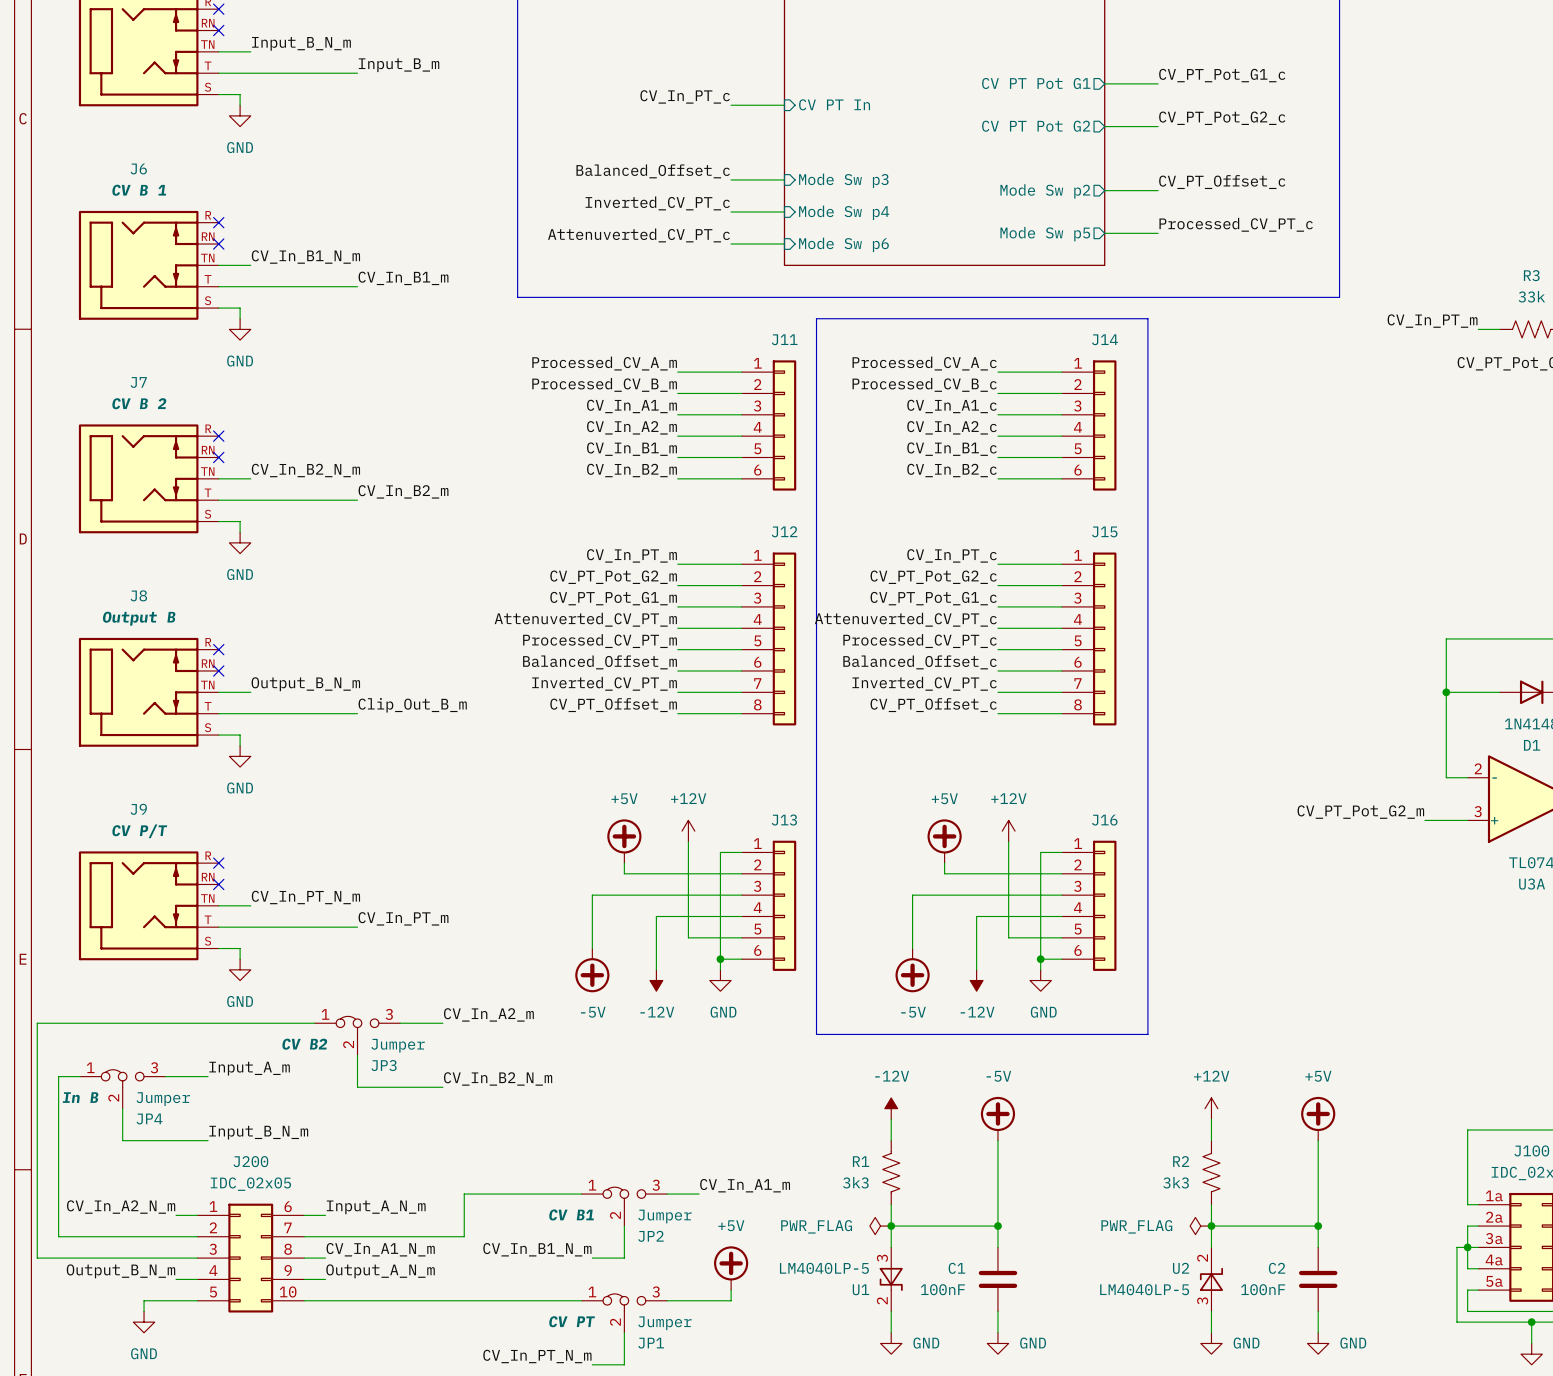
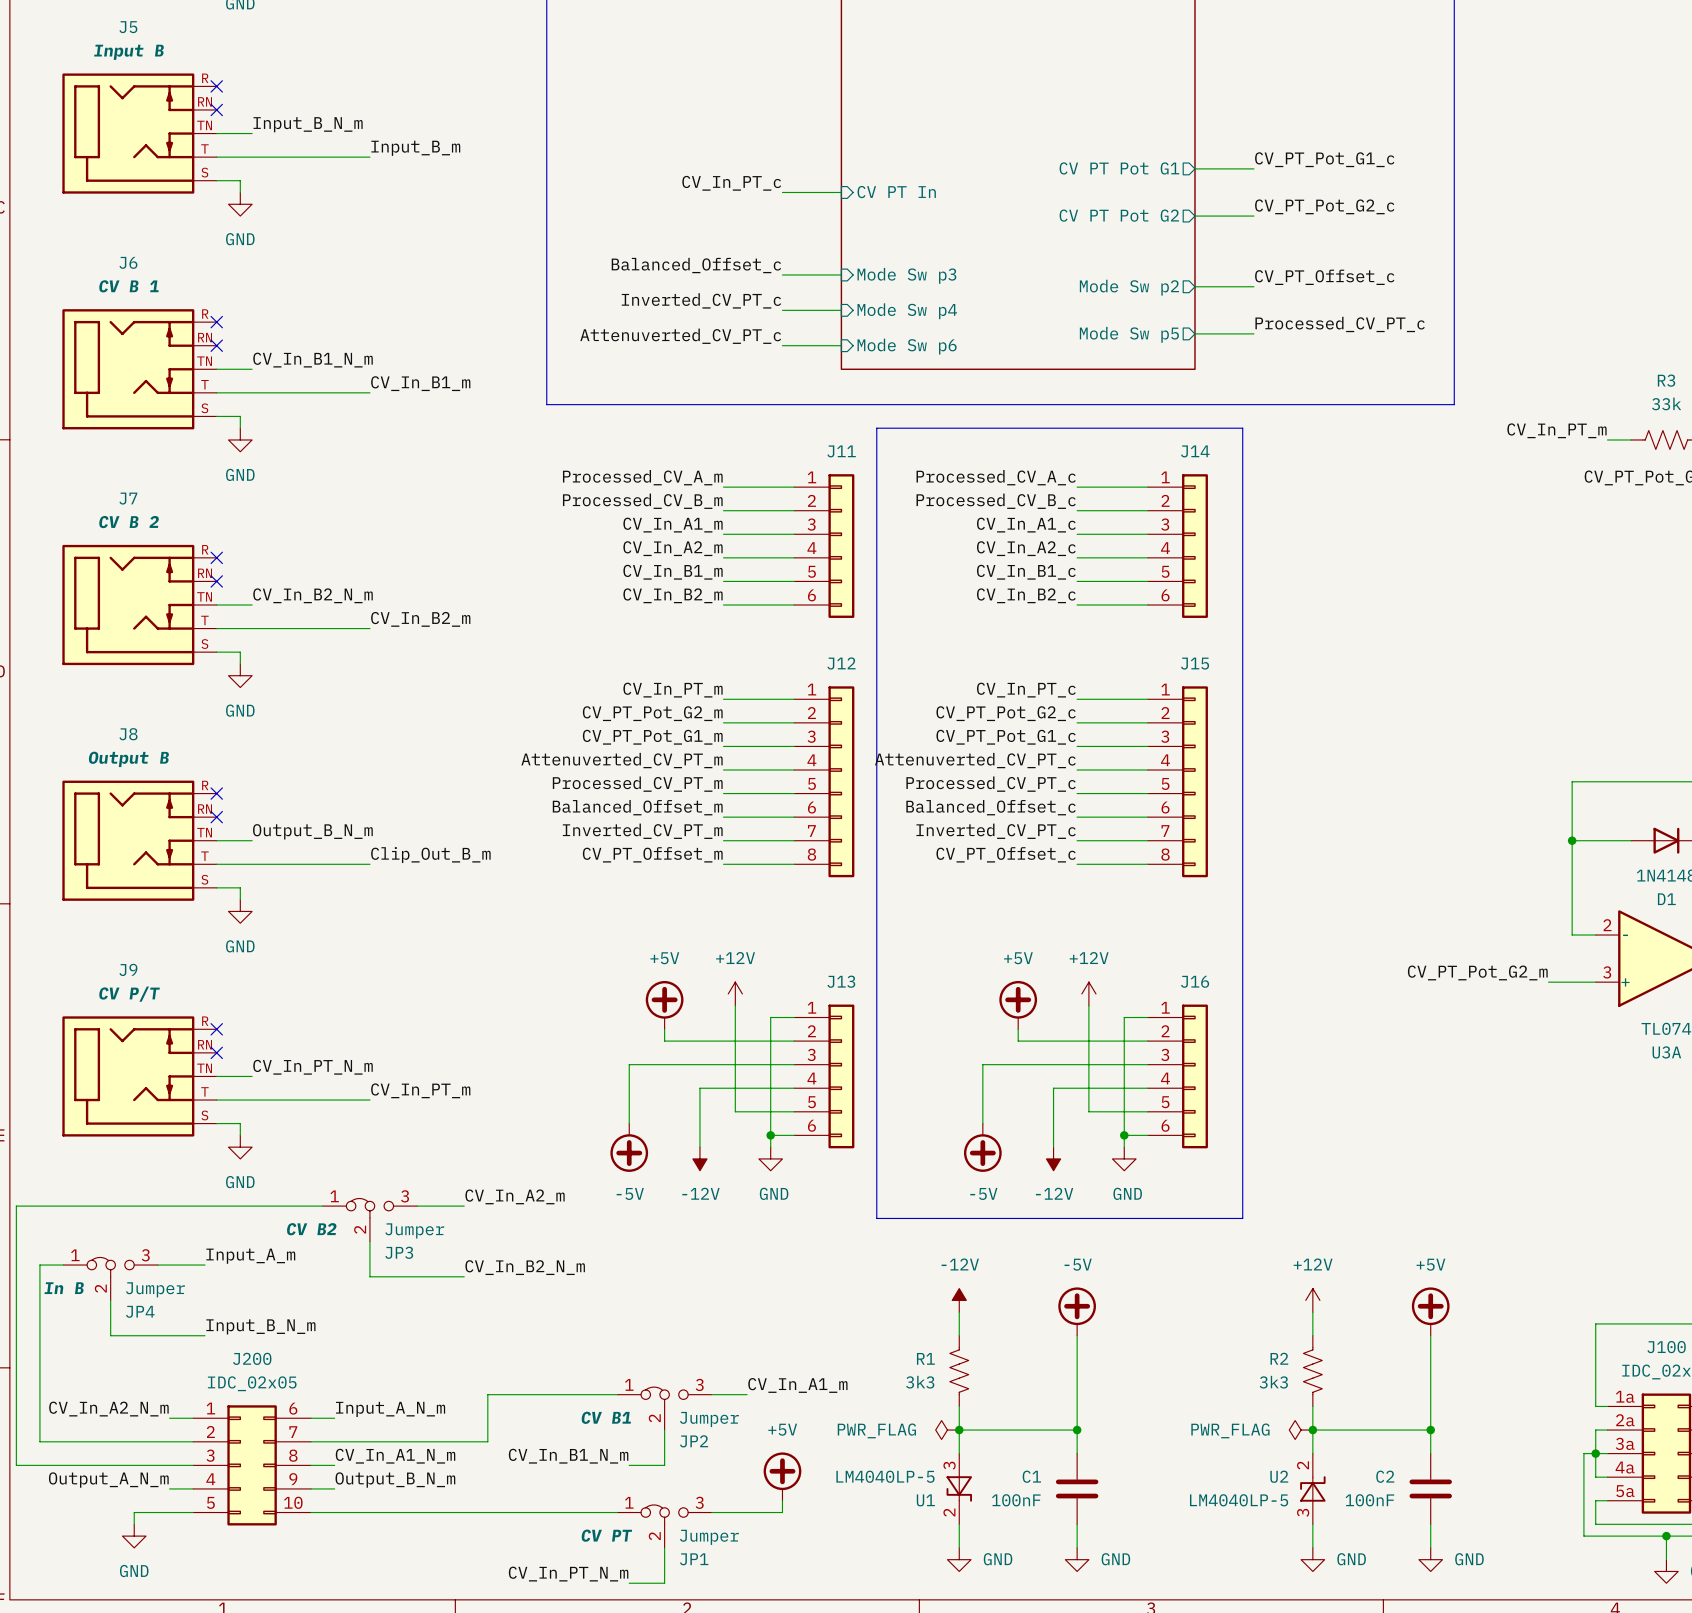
label: Output_B_N_m (121, 1271) -> Output_A_N_m (108, 1480)
label: Output_A_N_m (380, 1271) -> Output_B_N_m (395, 1480)

